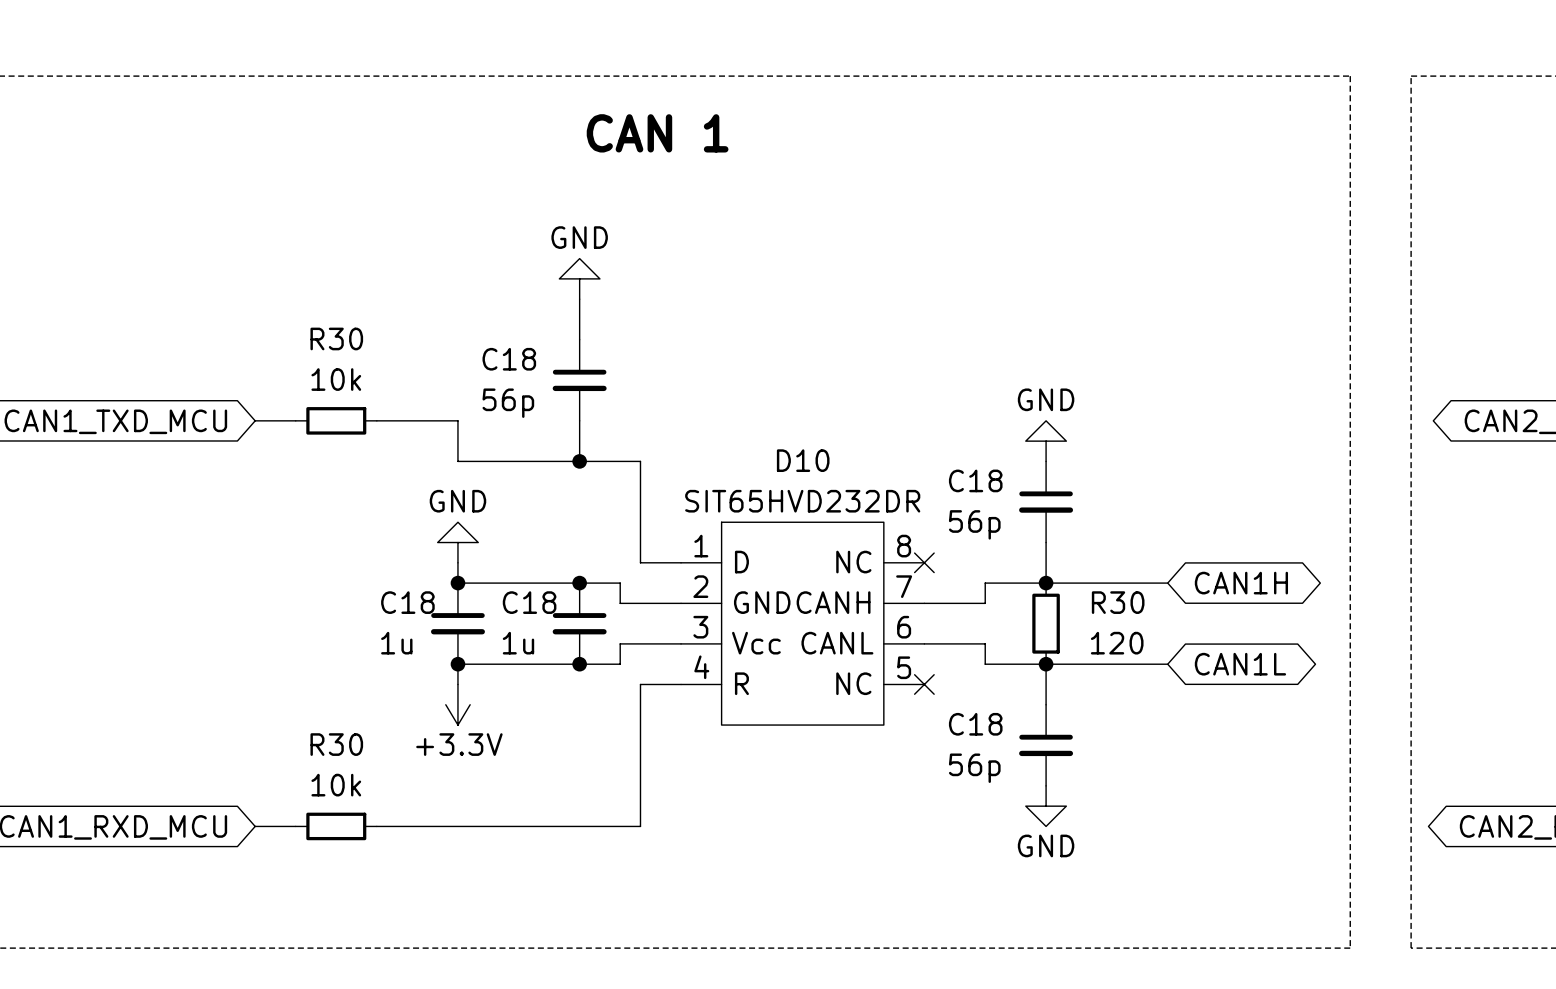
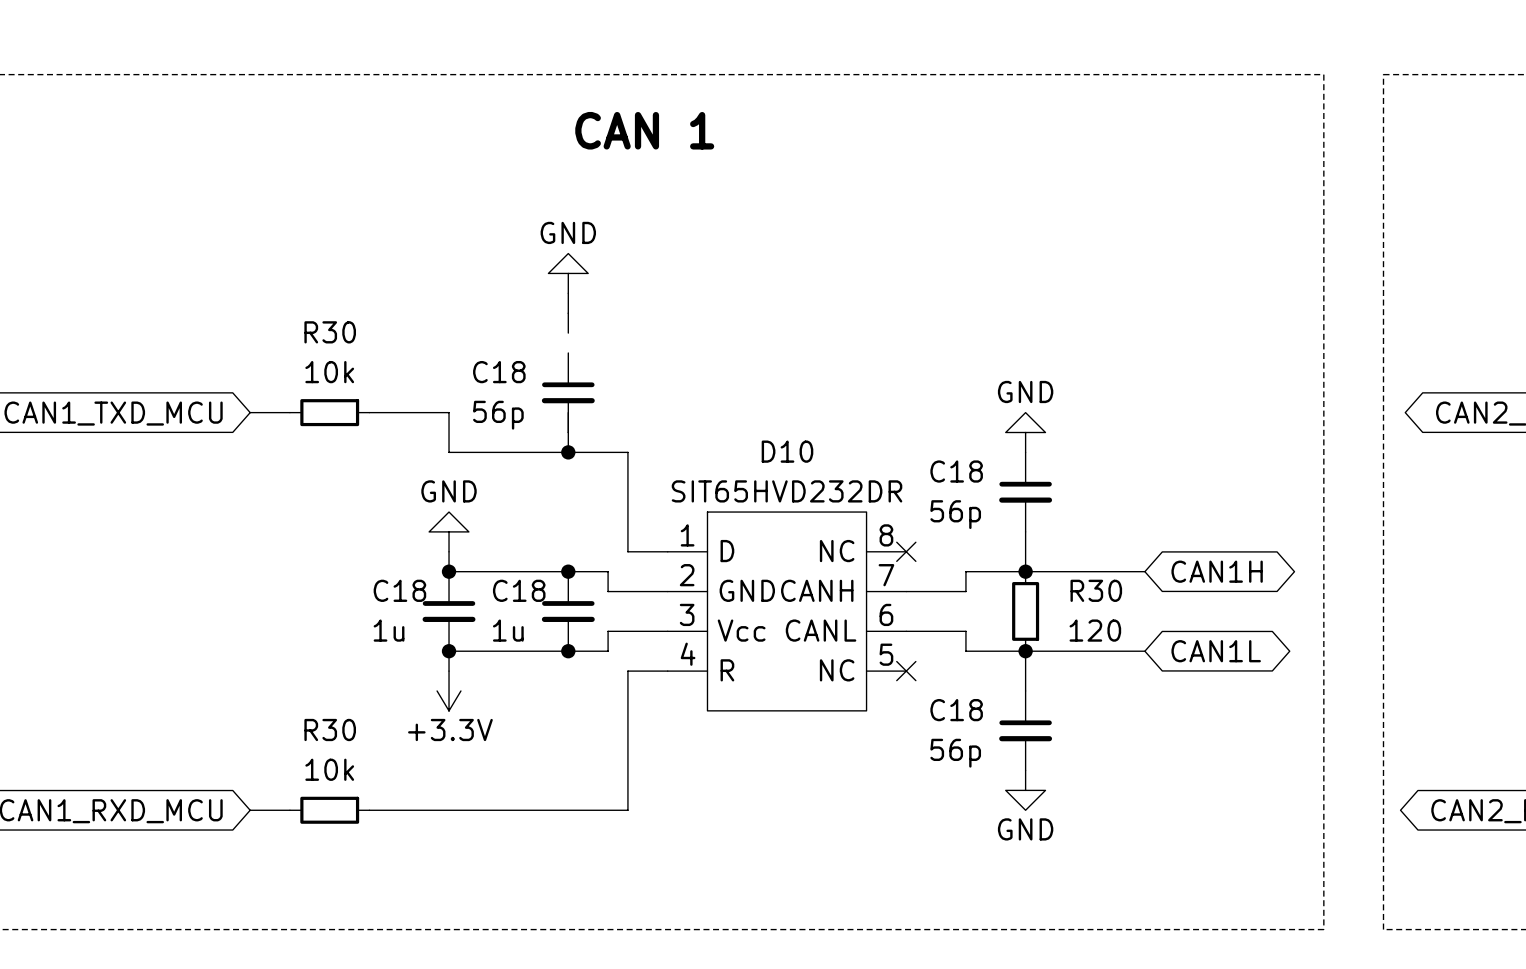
C18 position: (579, 380) -> (568, 392)

